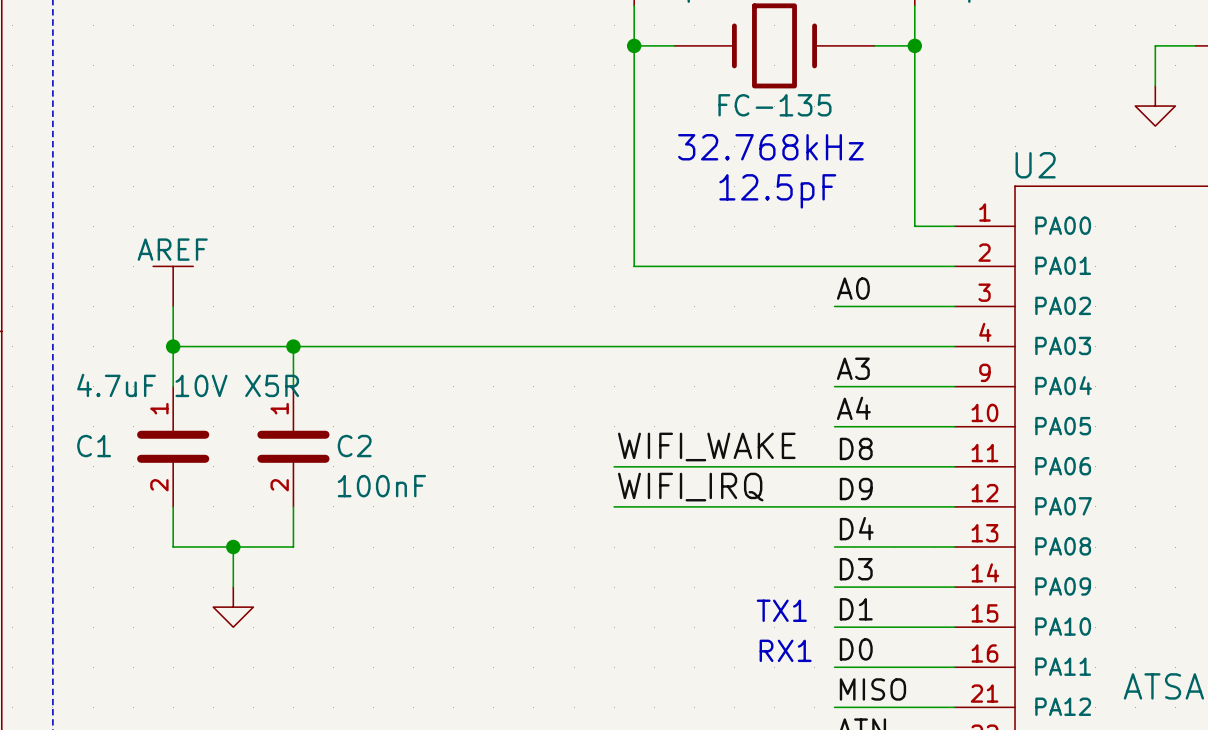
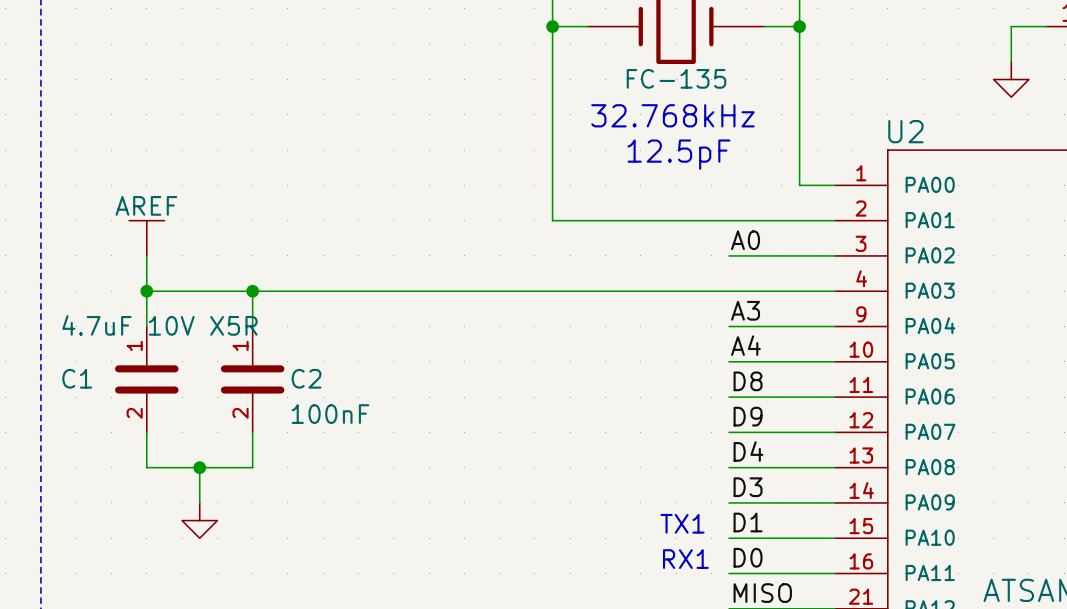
label: WIFI_WAKE (706, 446) -> none
wire: (614, 466) (834, 466) -> none
label: WIFI_IRQ (690, 487) -> none
wire: (614, 506) (834, 506) -> none

